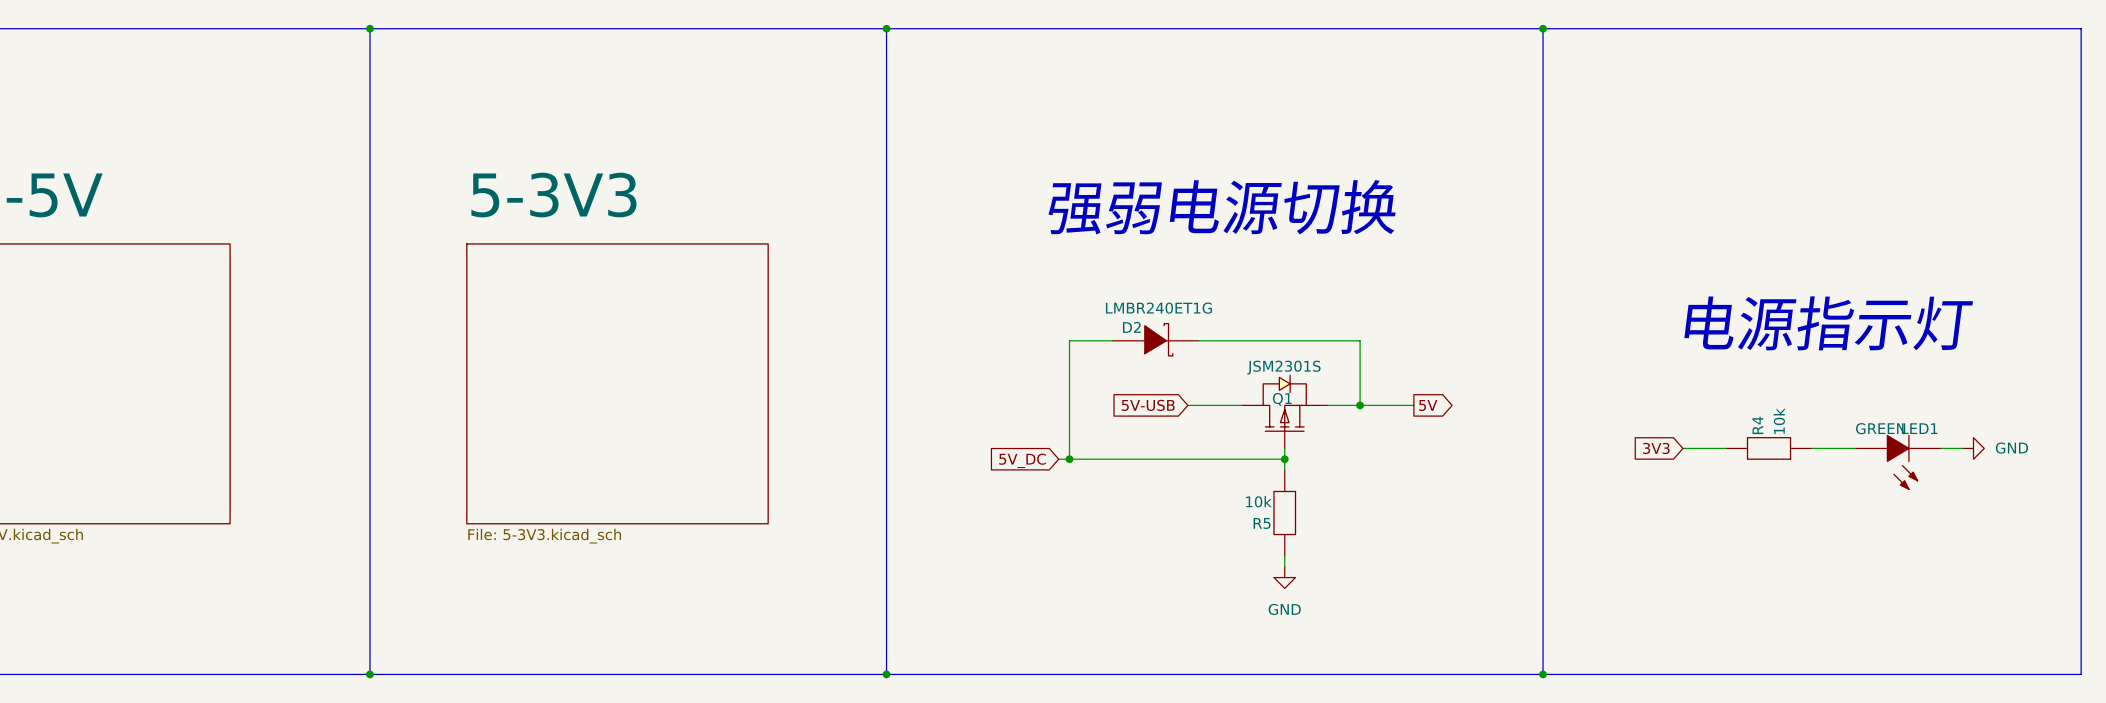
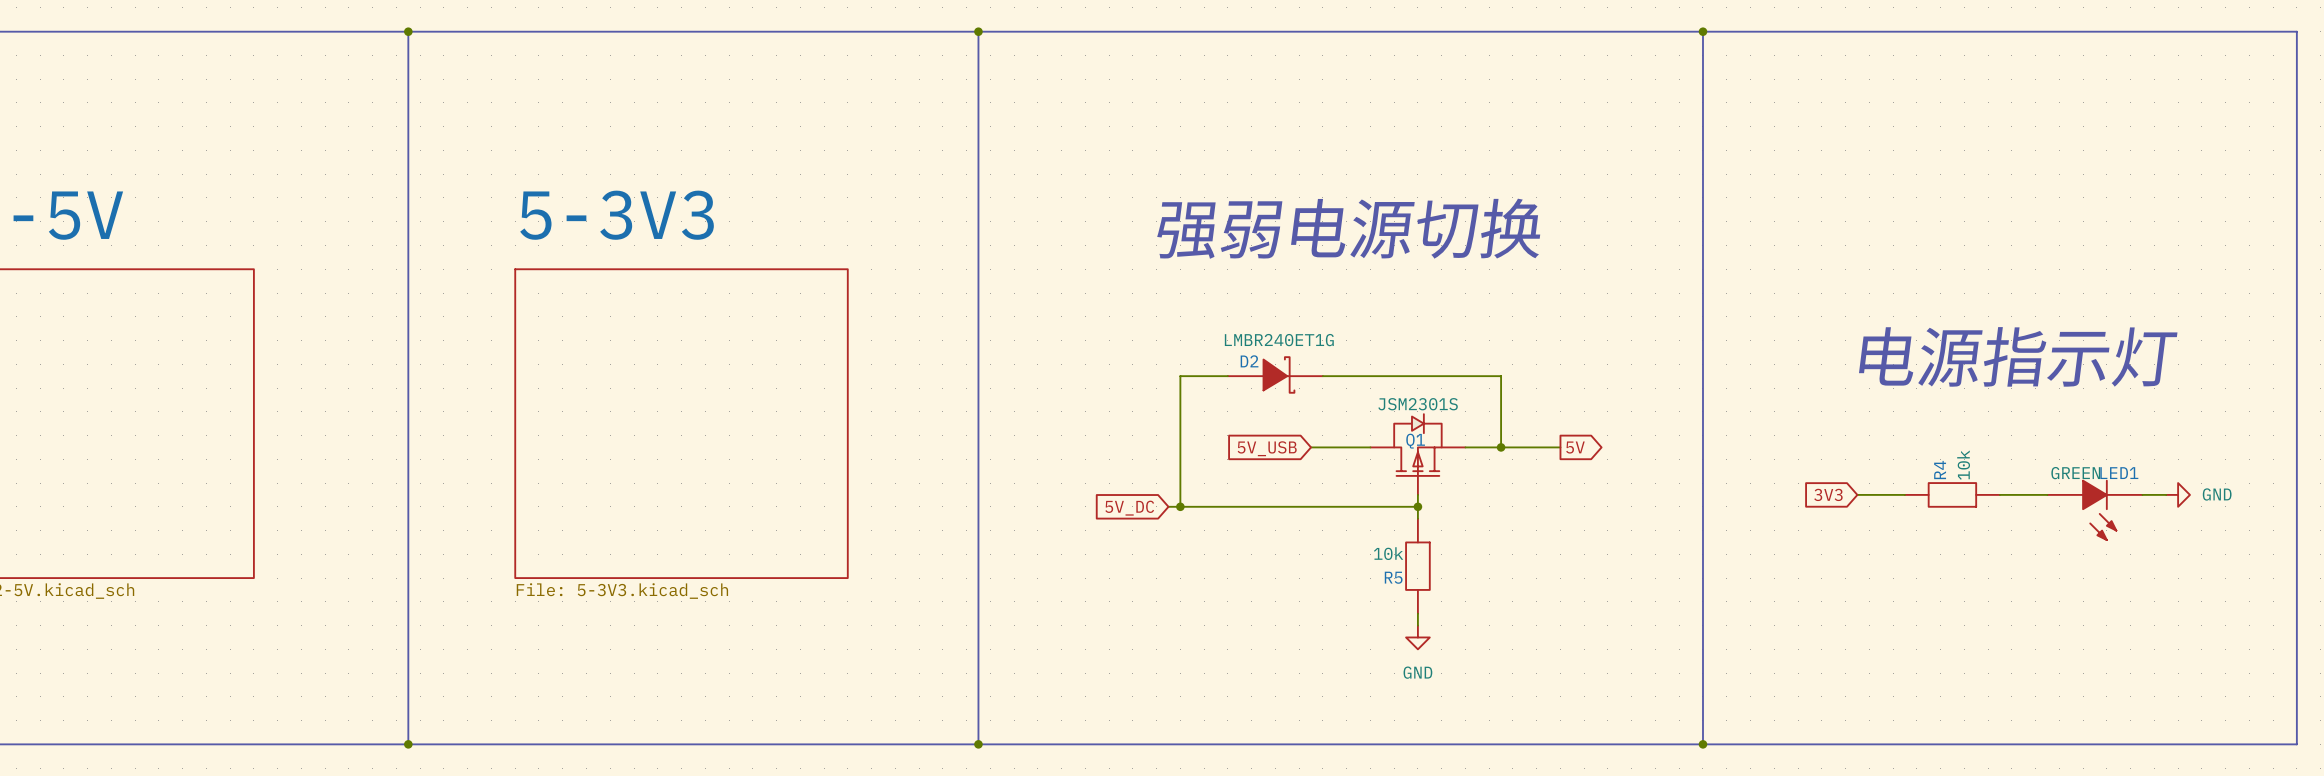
global label: 5V-USB (1148, 405) -> 5V_USB (1267, 448)

